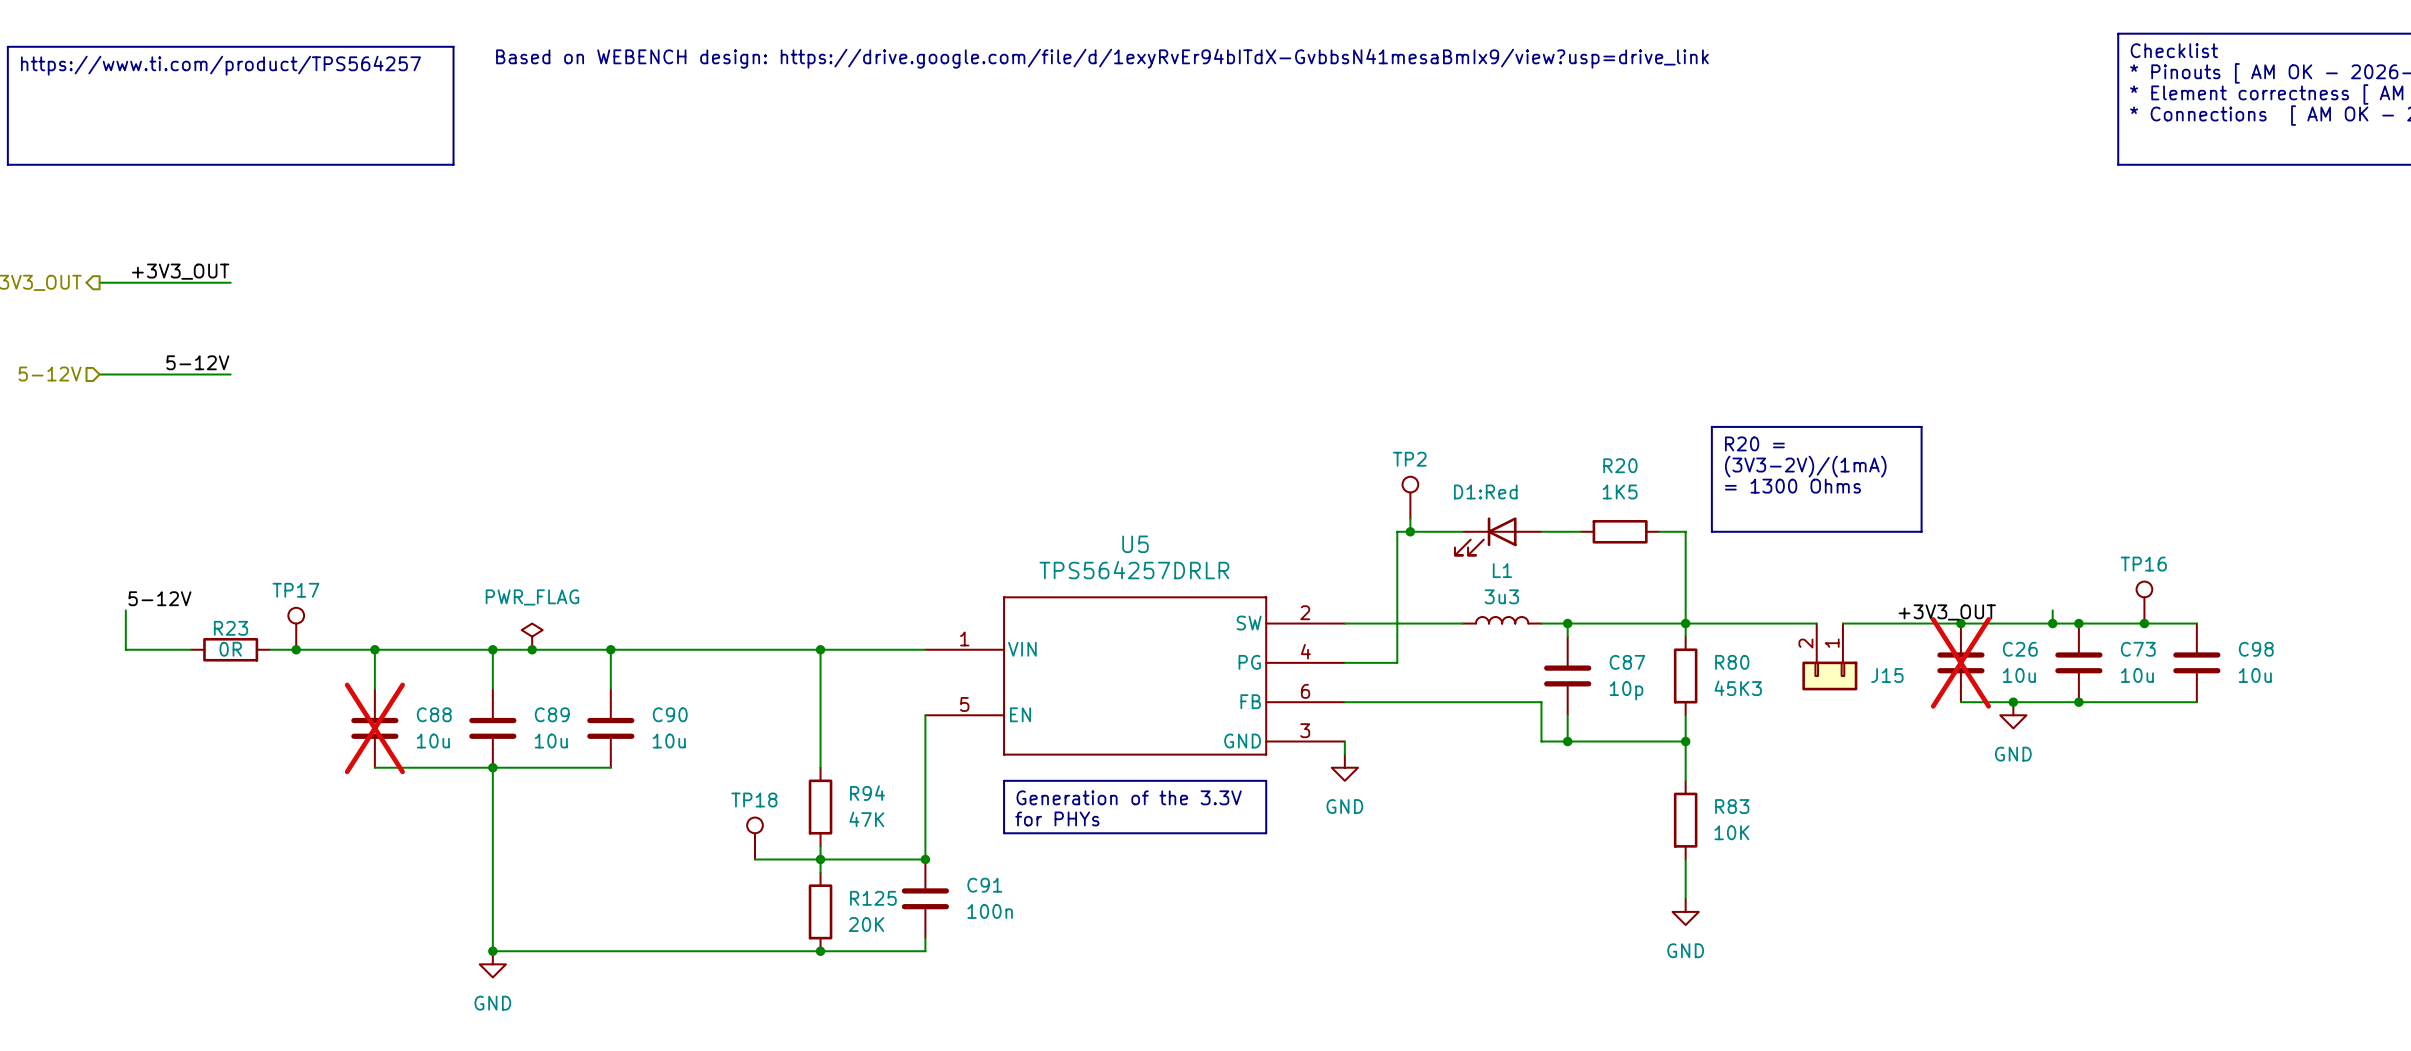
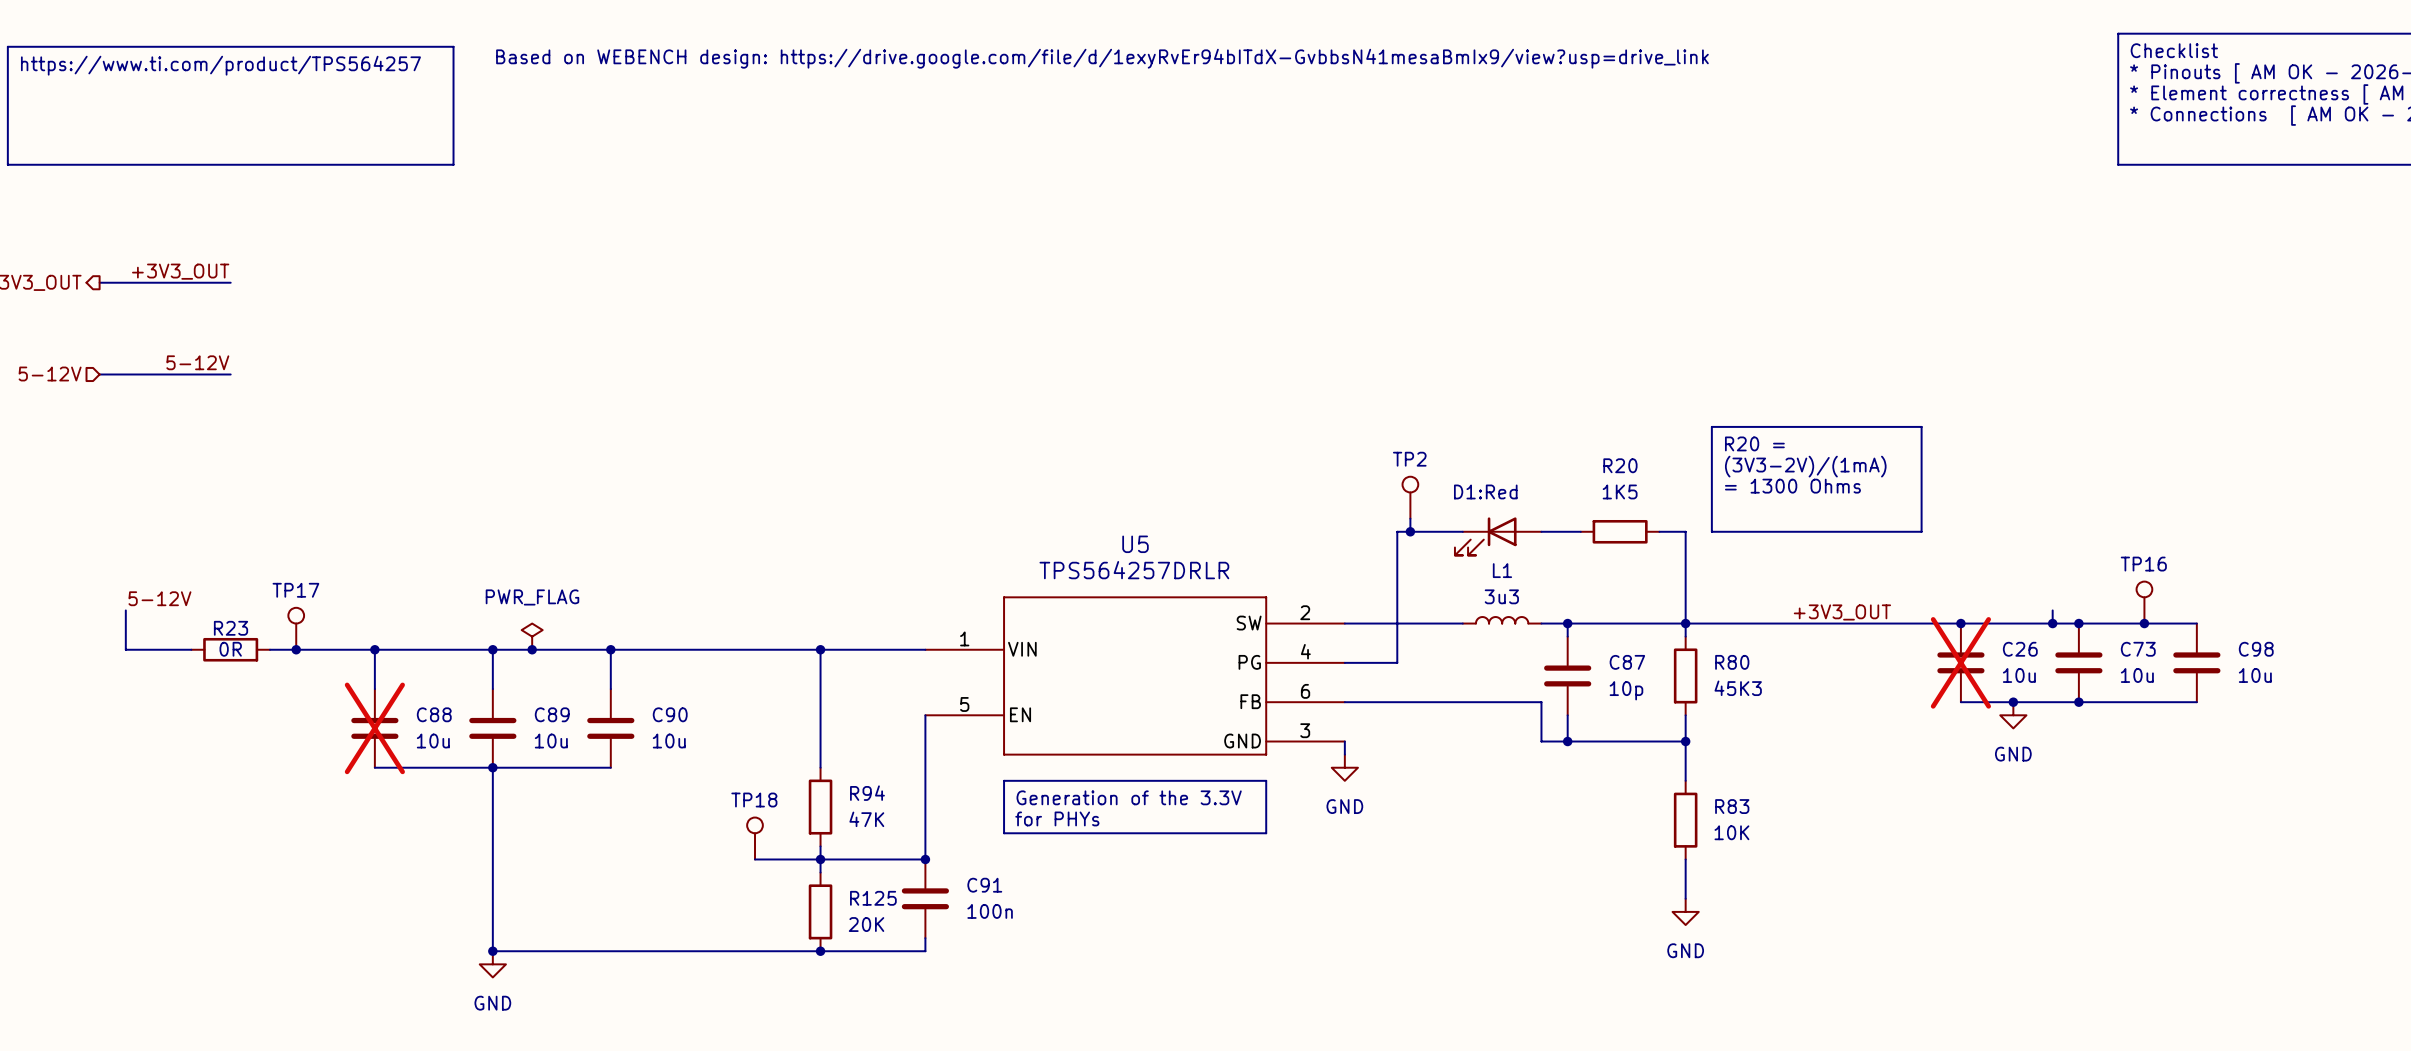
label position: +3V3_OUT (1947, 612) -> +3V3_OUT (1842, 612)
wire: none -> (1816, 623) (1842, 623)
J15: (1829, 656) -> none

